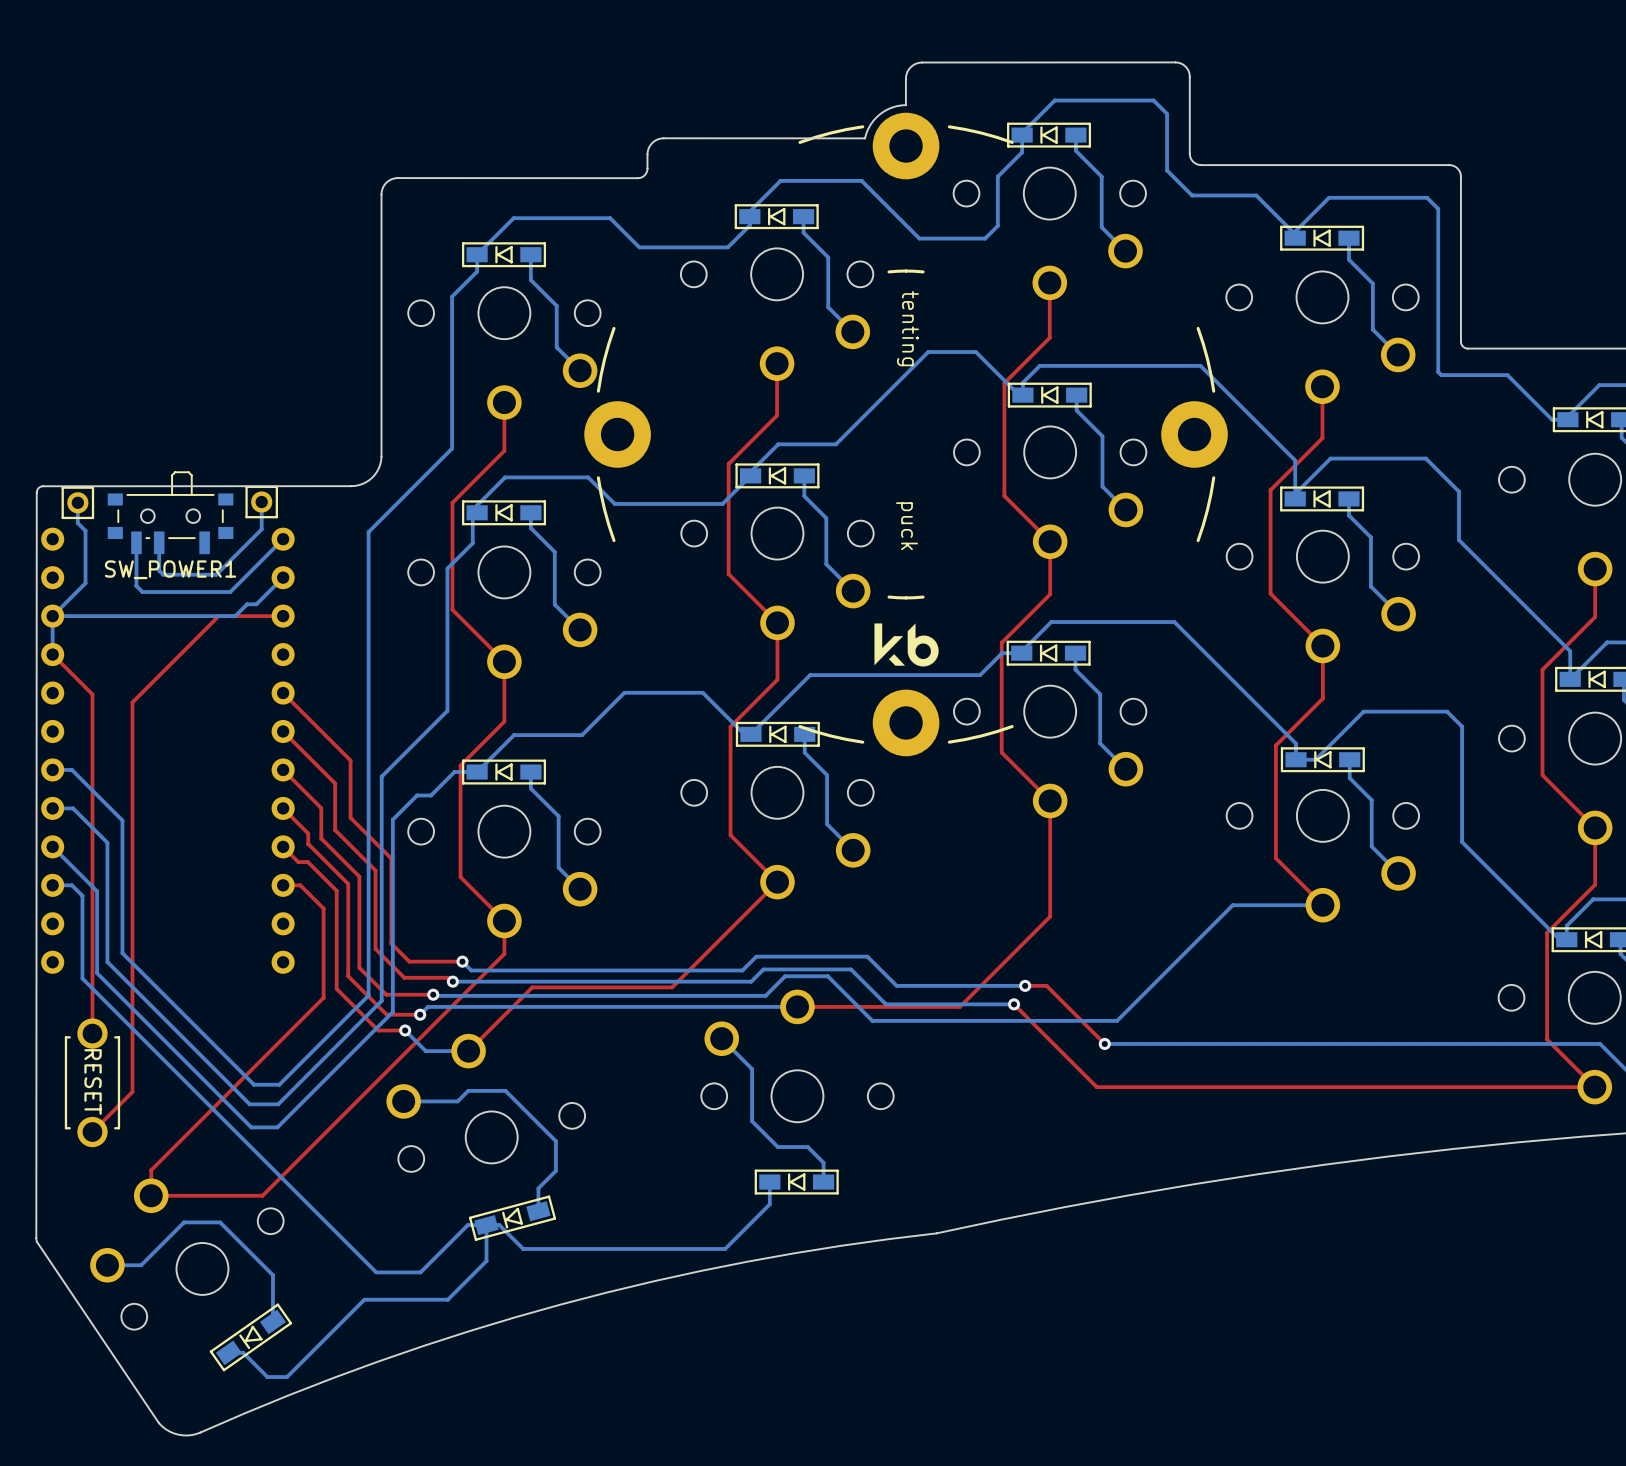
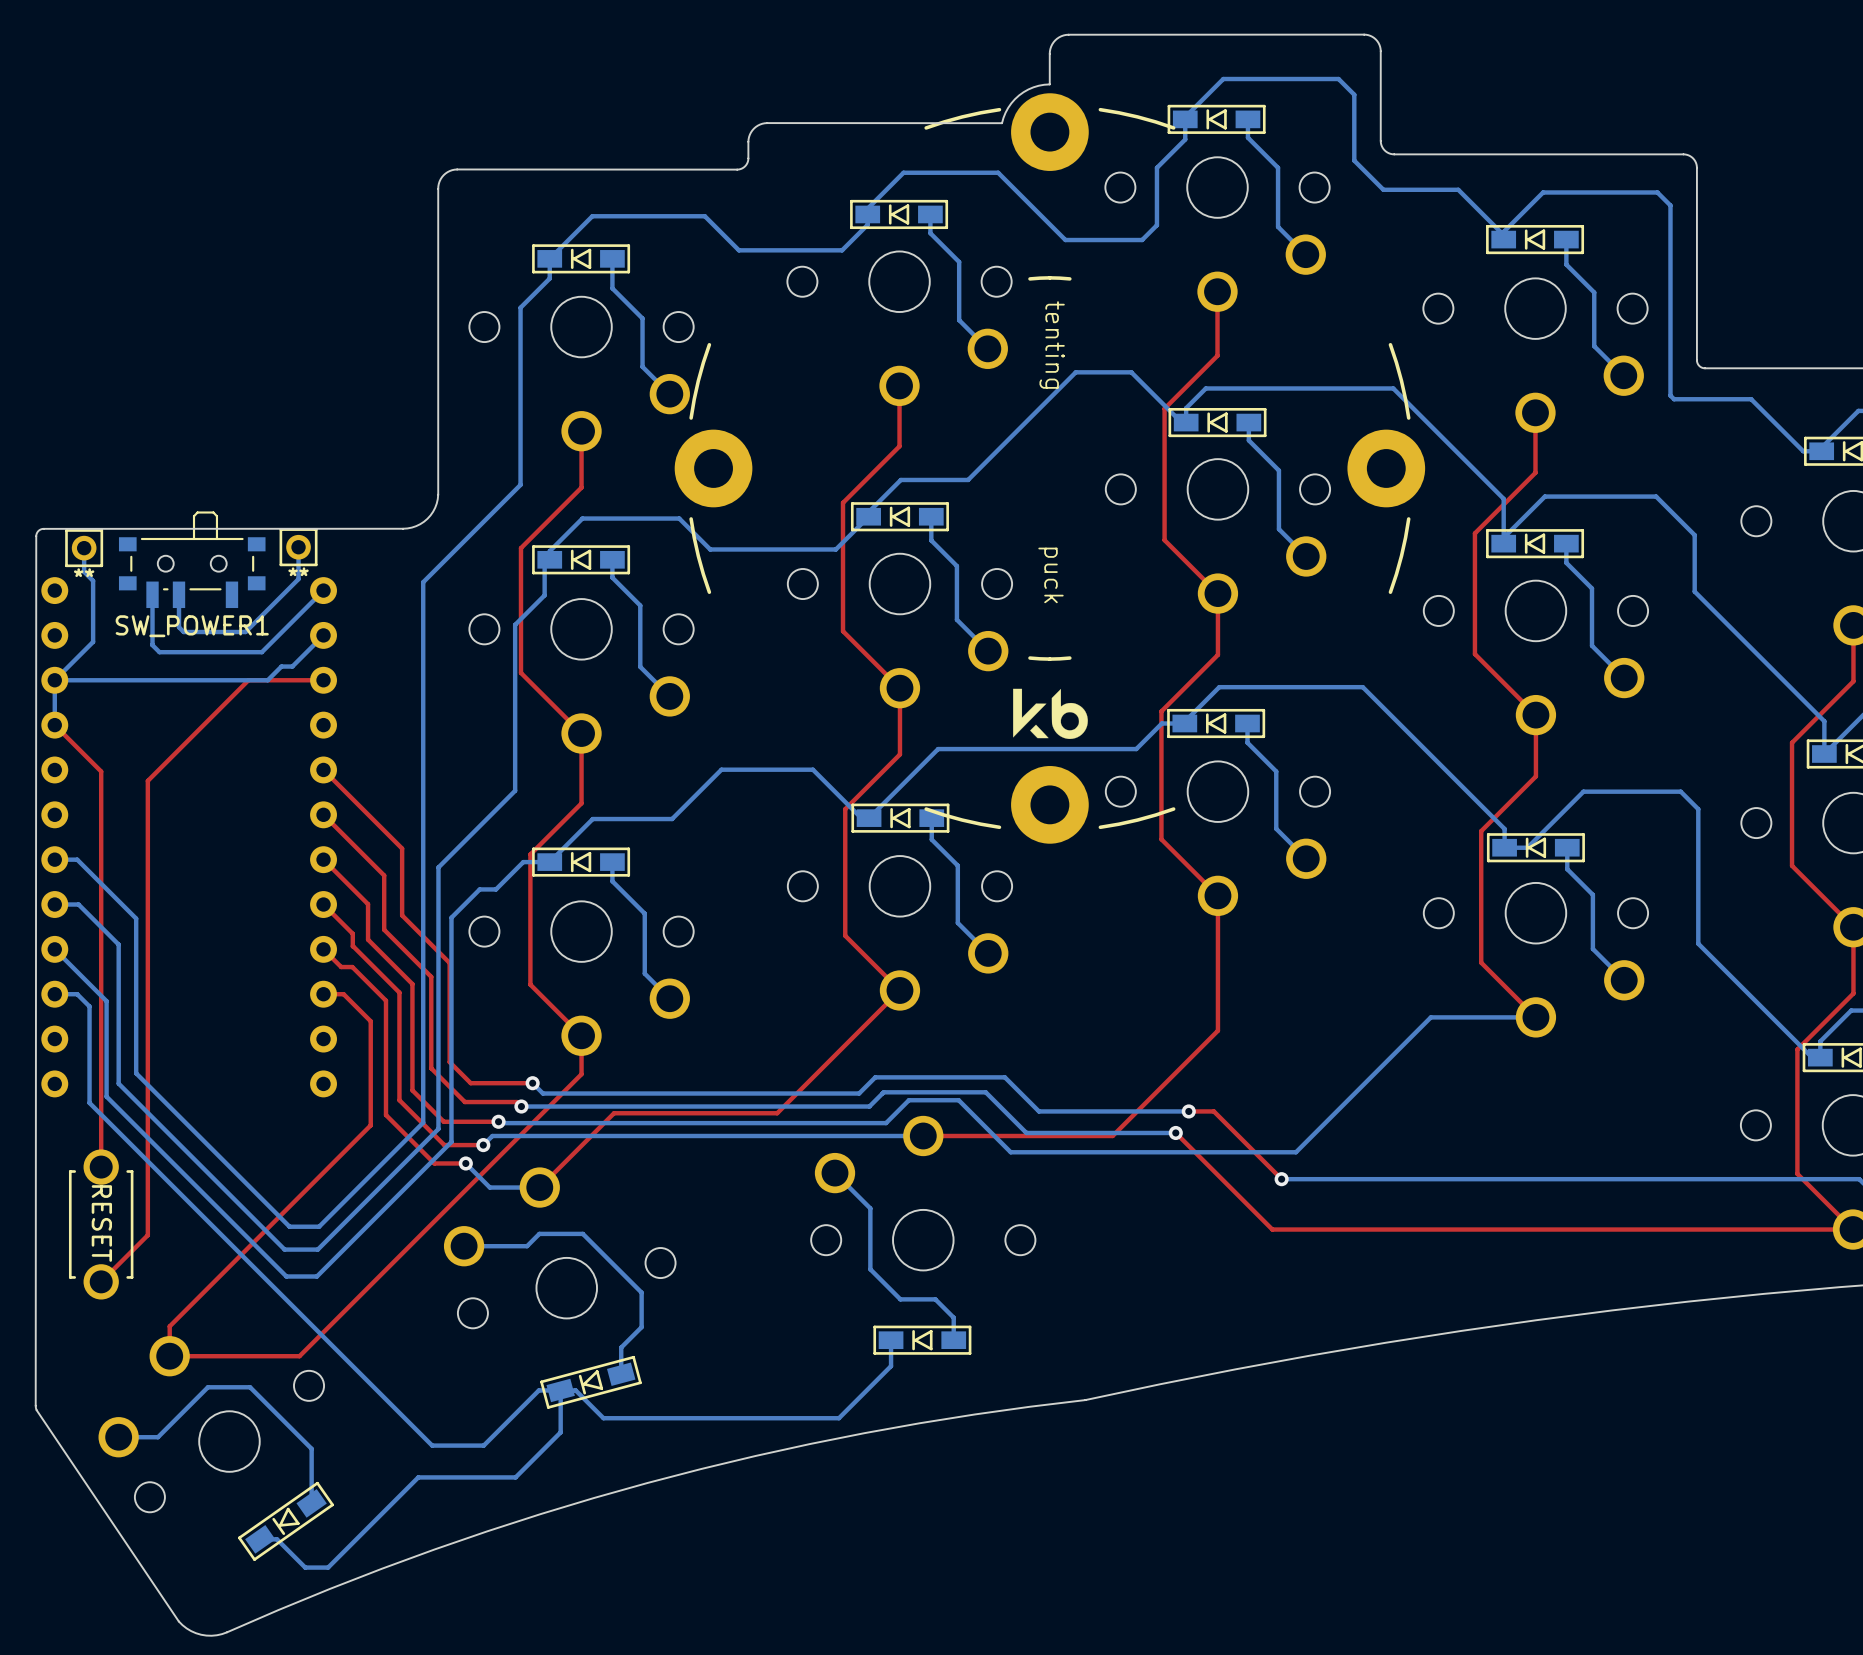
part text: none -> ** (84, 572)
part text: none -> ** (298, 571)

